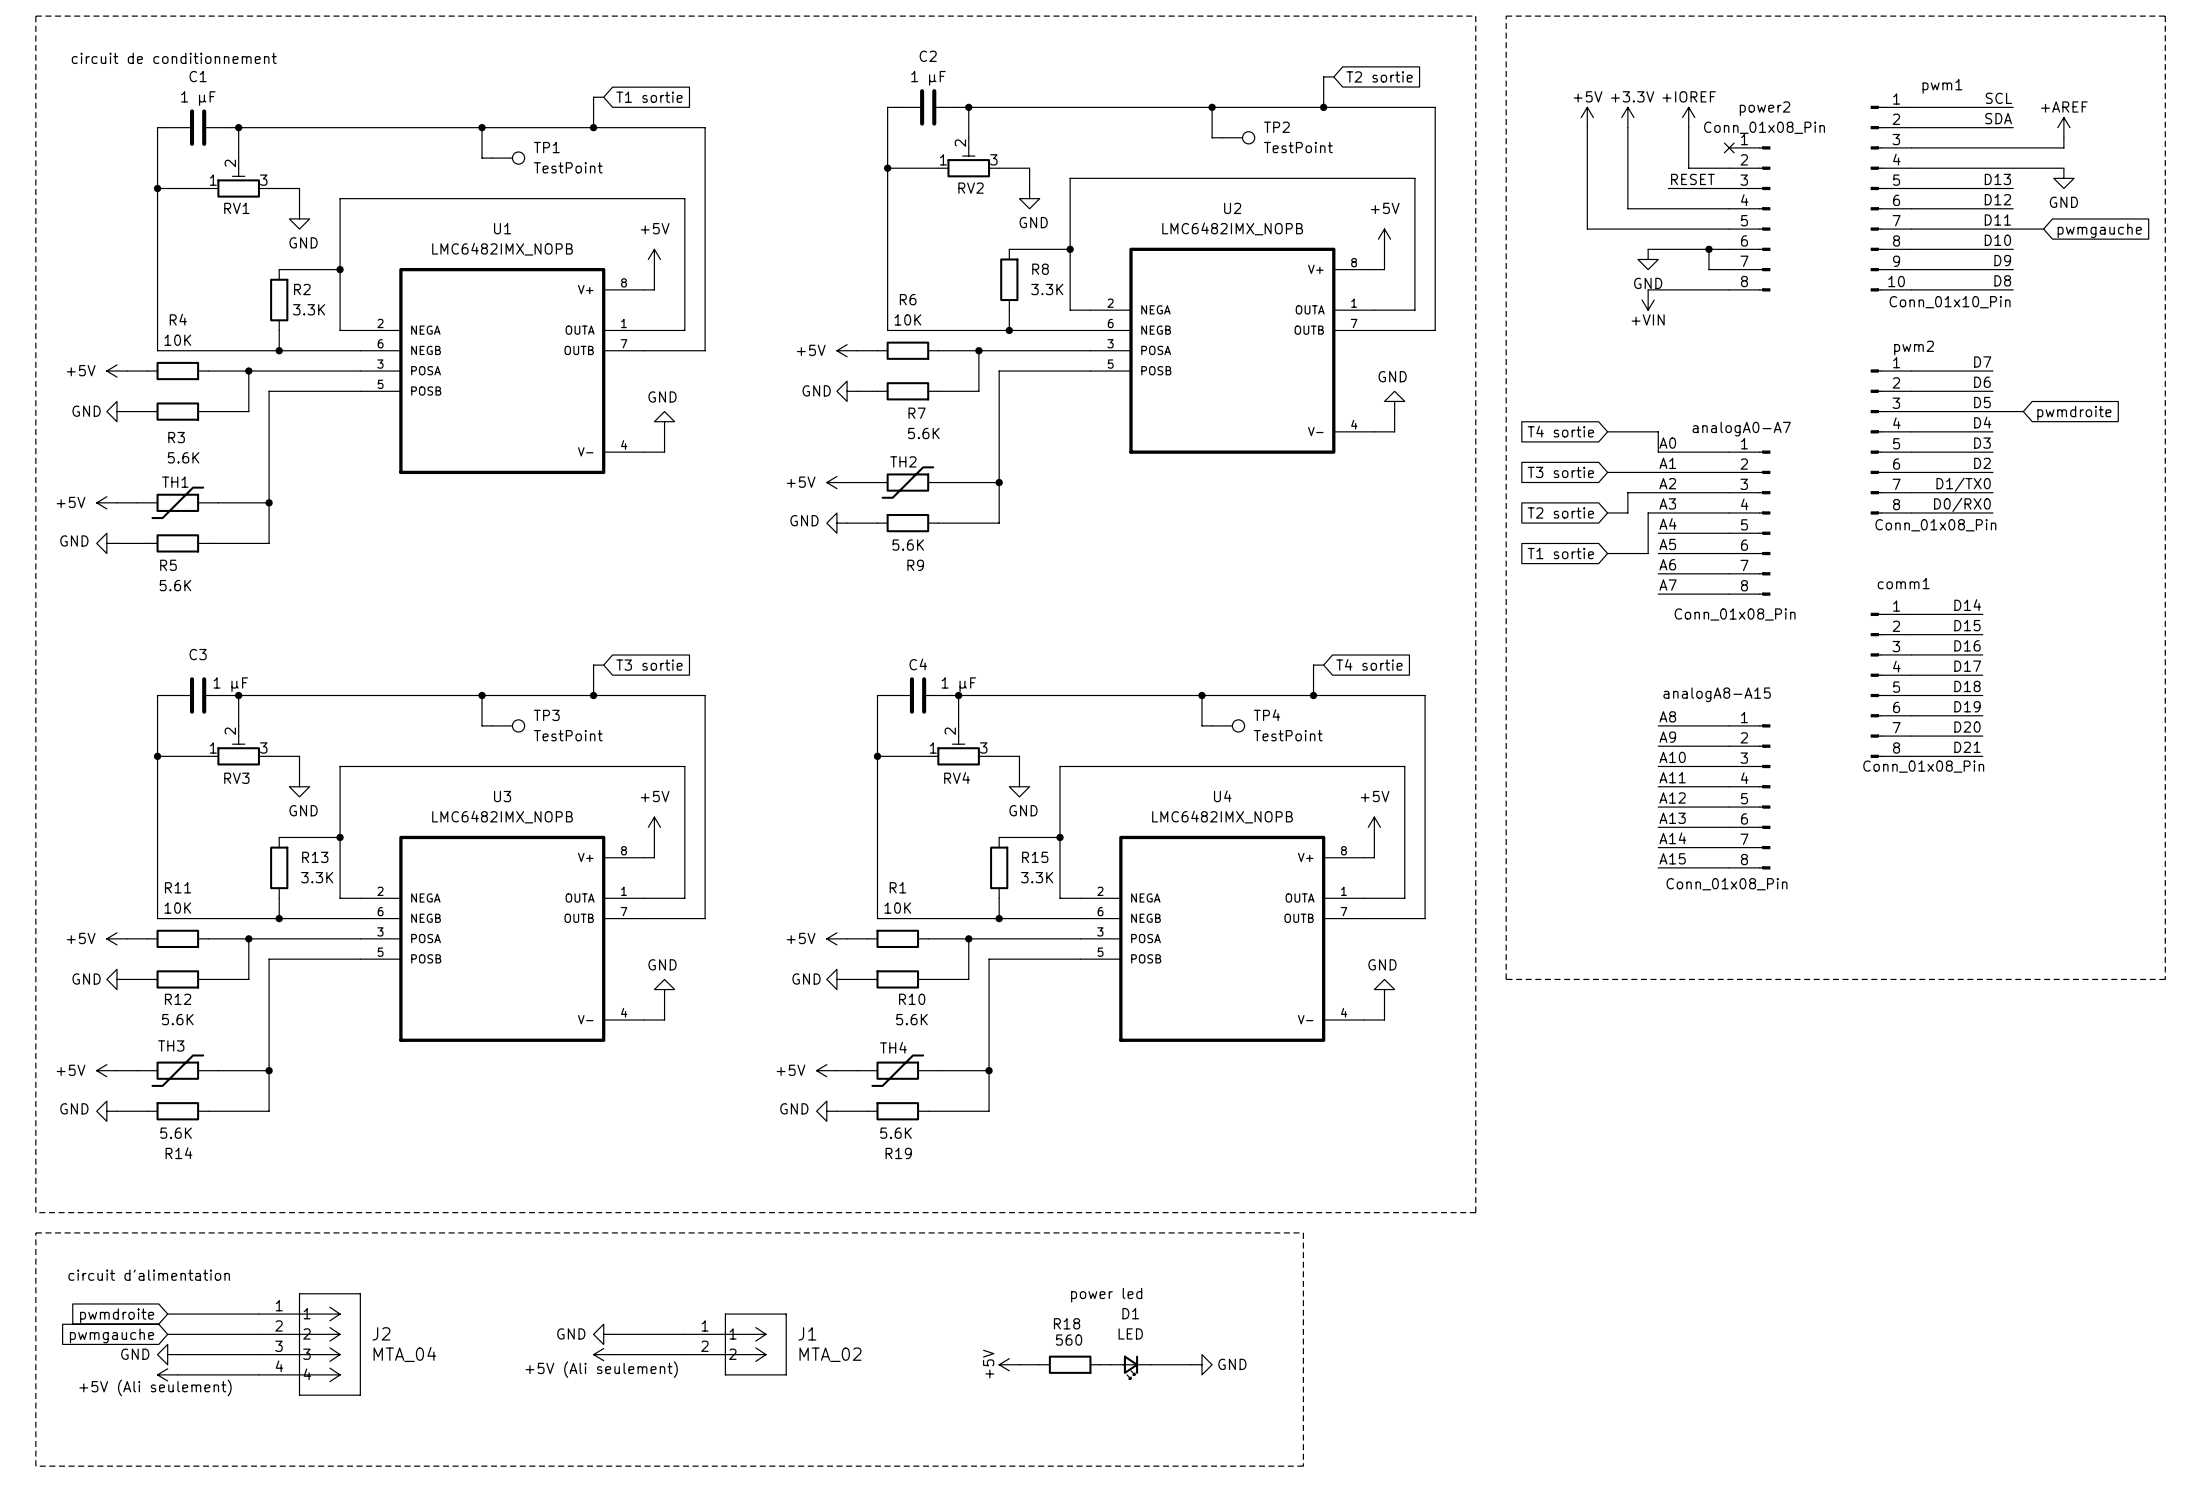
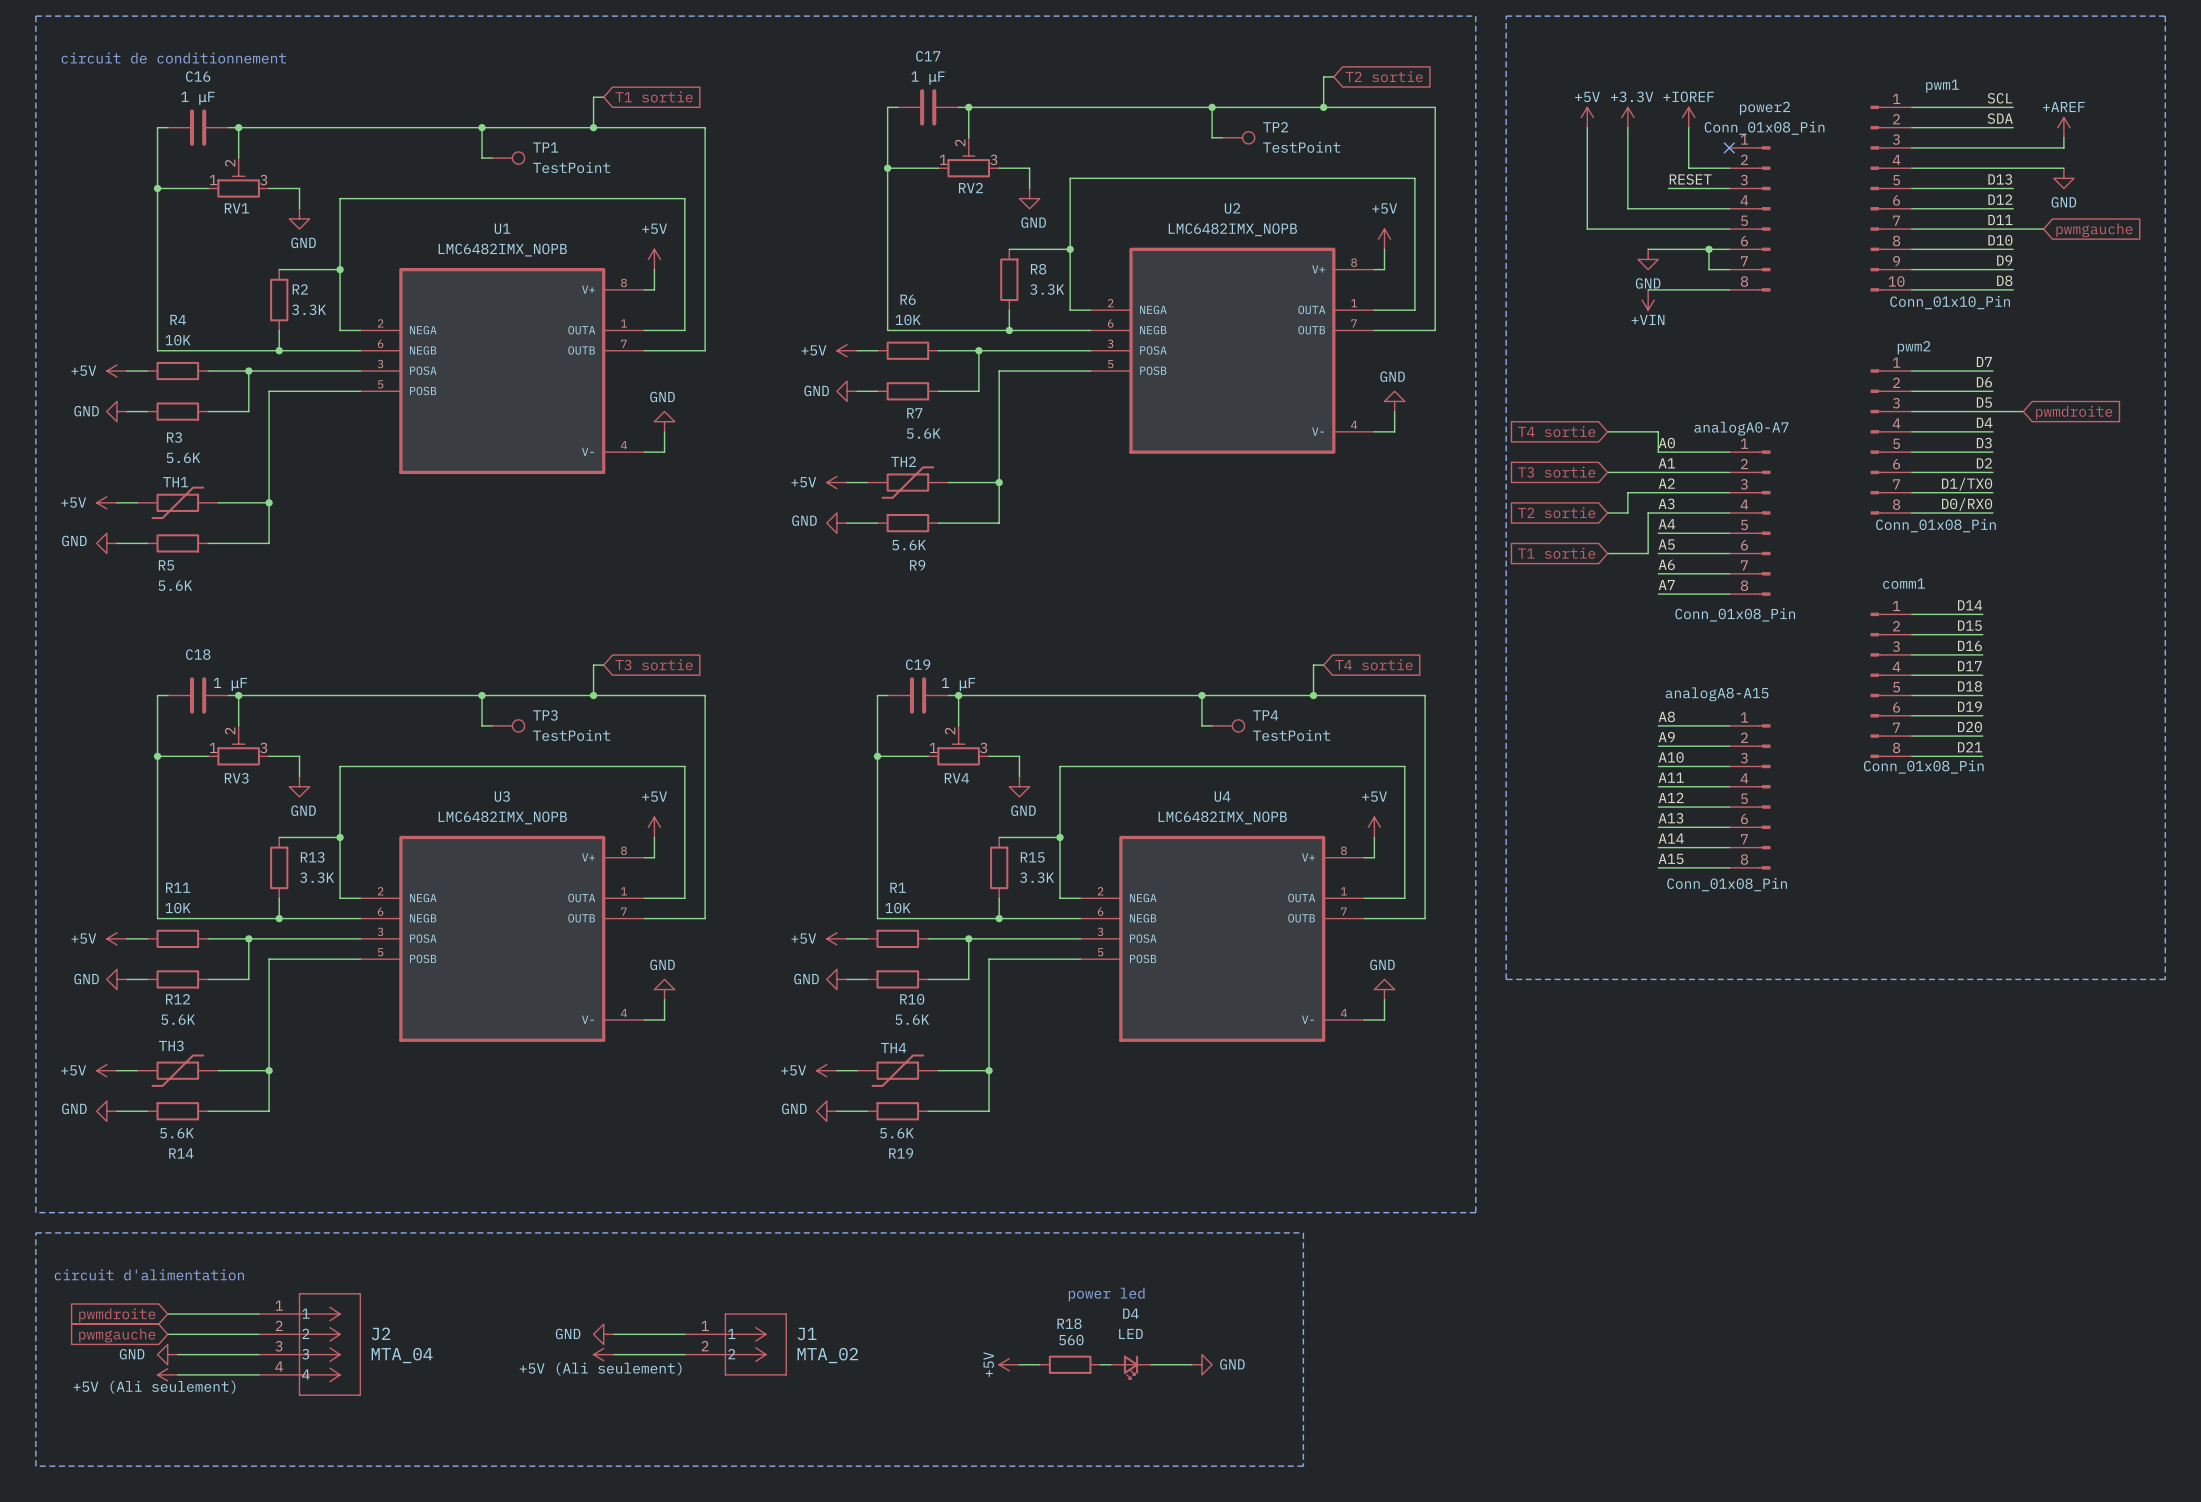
C2 name: C2 (928, 56) -> C17 (928, 56)
C1 name: C1 (198, 76) -> C16 (198, 76)
C3 name: C3 (198, 654) -> C18 (198, 654)
C4 name: C4 (918, 664) -> C19 (918, 664)
D1 name: D1 (1130, 1313) -> D4 (1130, 1313)

